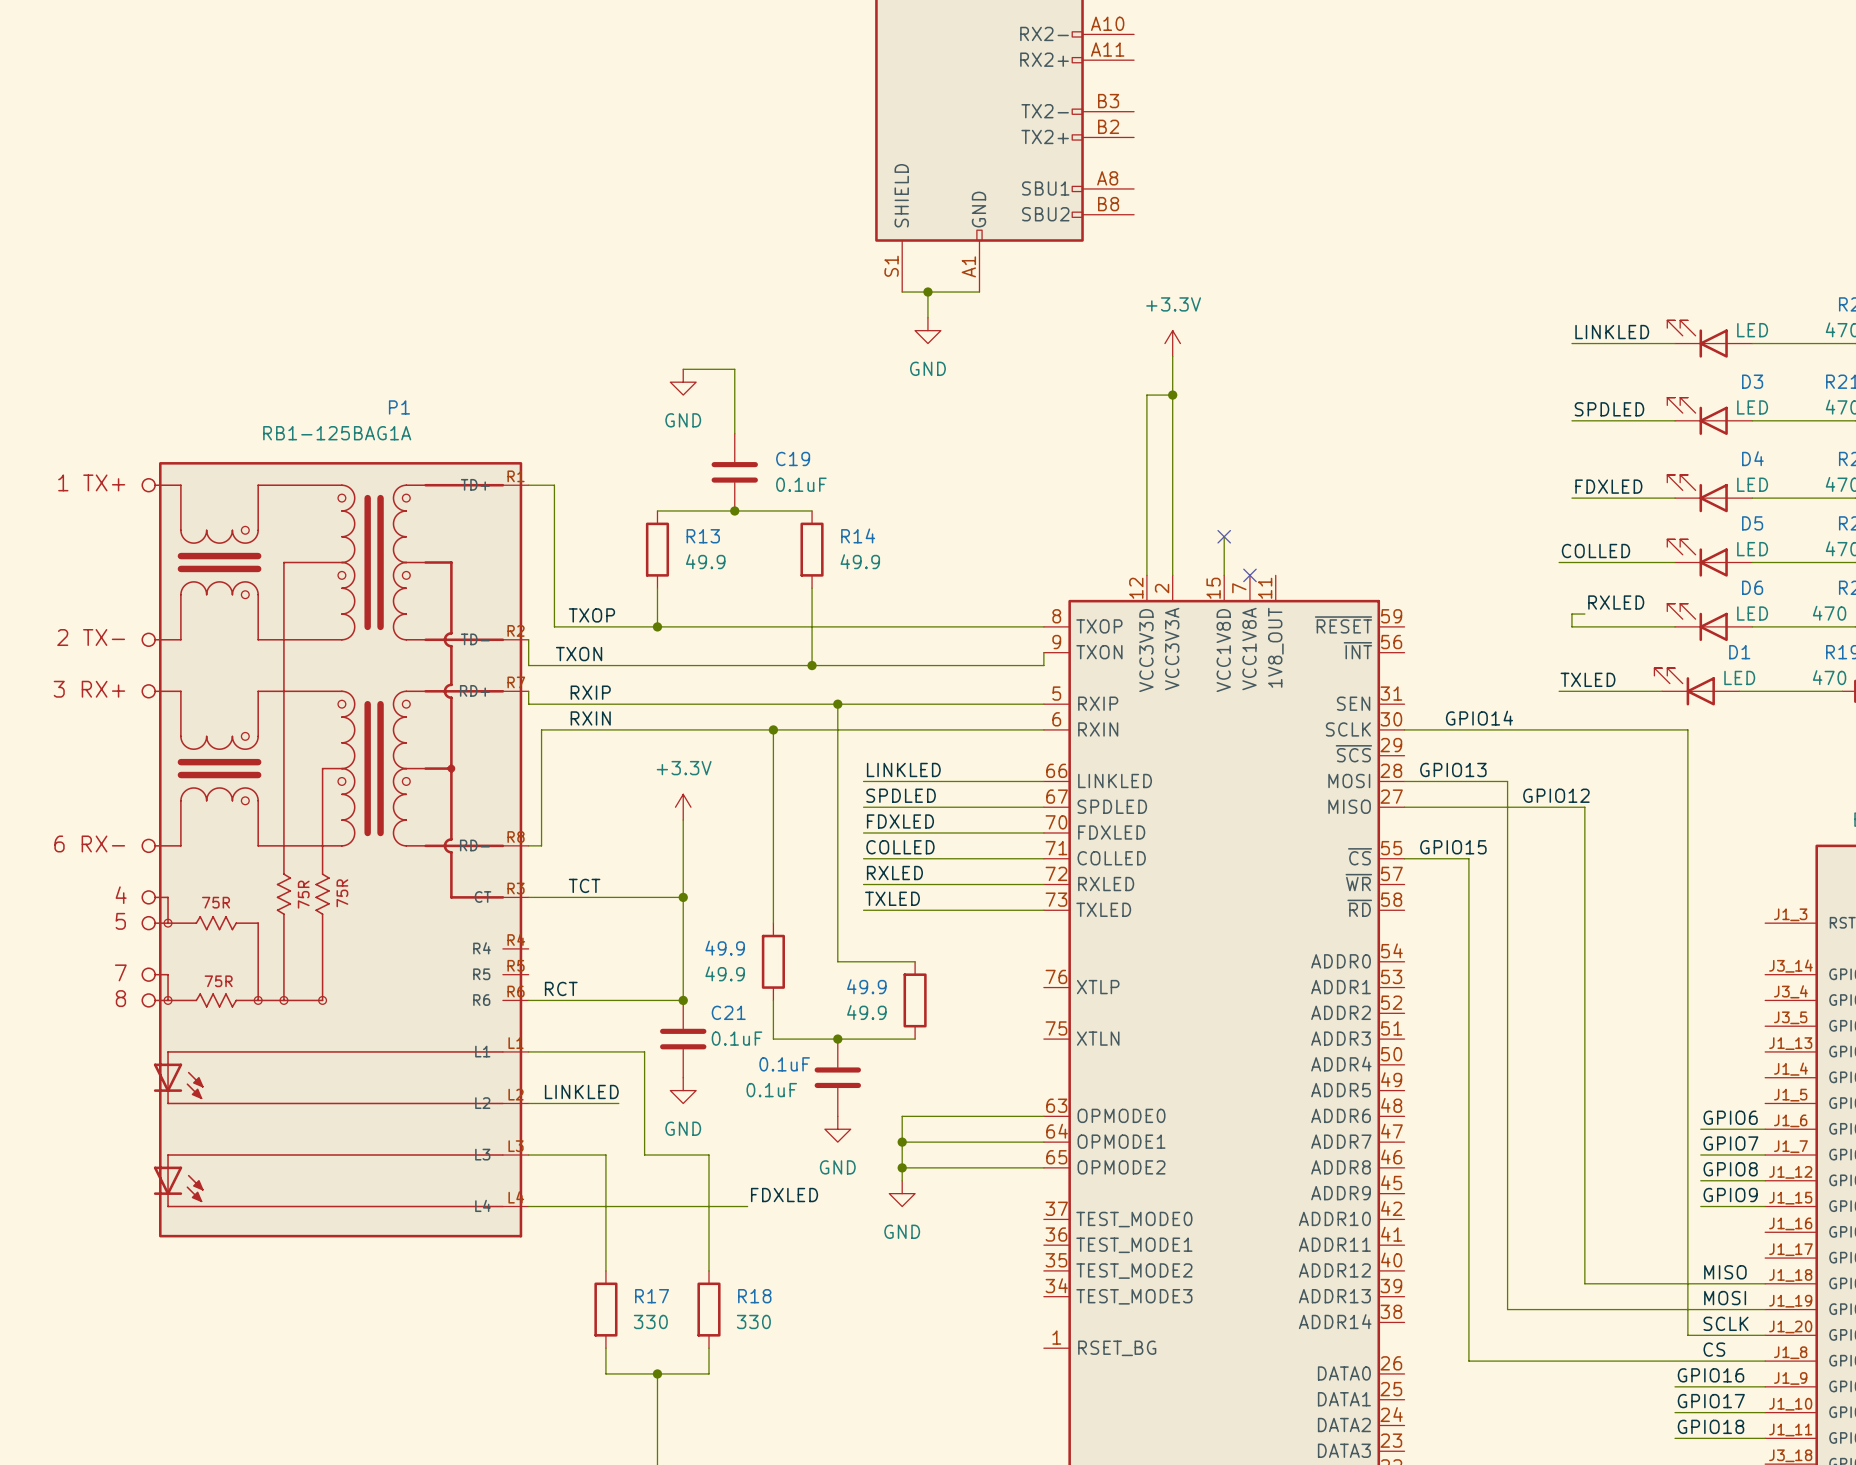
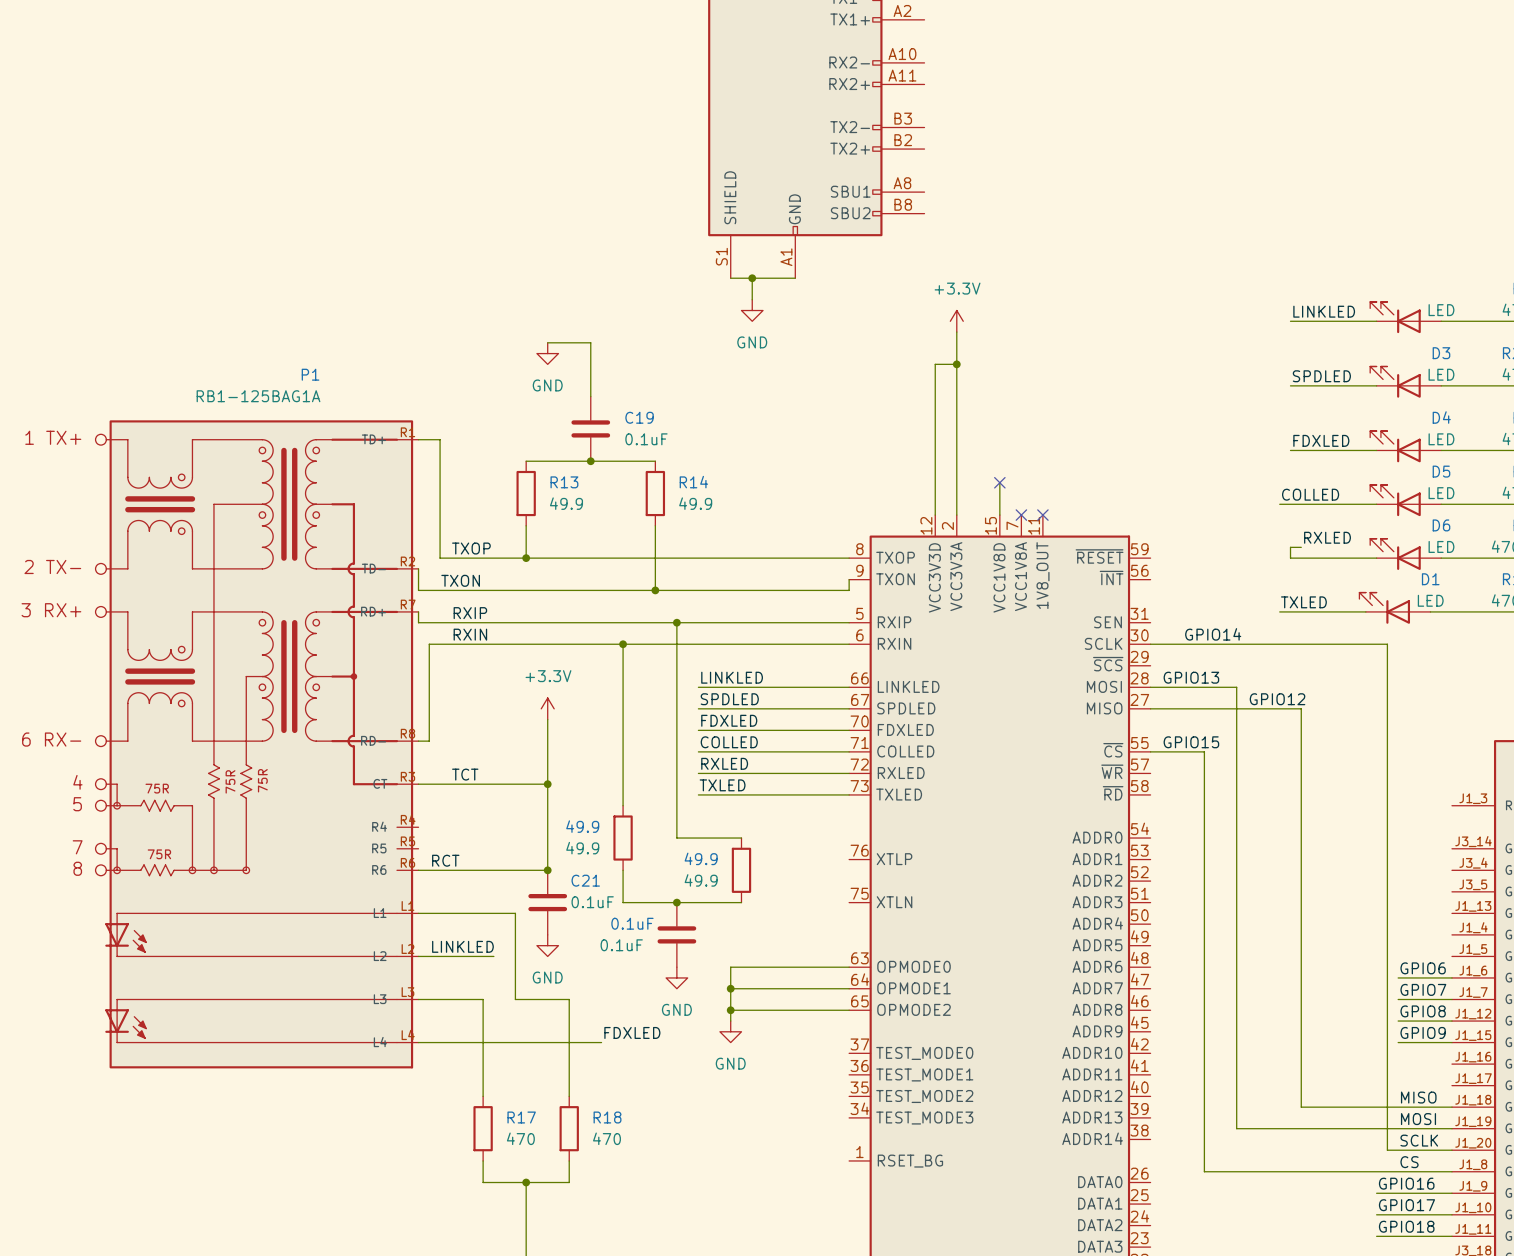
no-connect mark: none -> (1042, 515)
R17 value: 330 (650, 1321) -> 470 (520, 1138)
R18 value: 330 (753, 1321) -> 470 (606, 1138)

